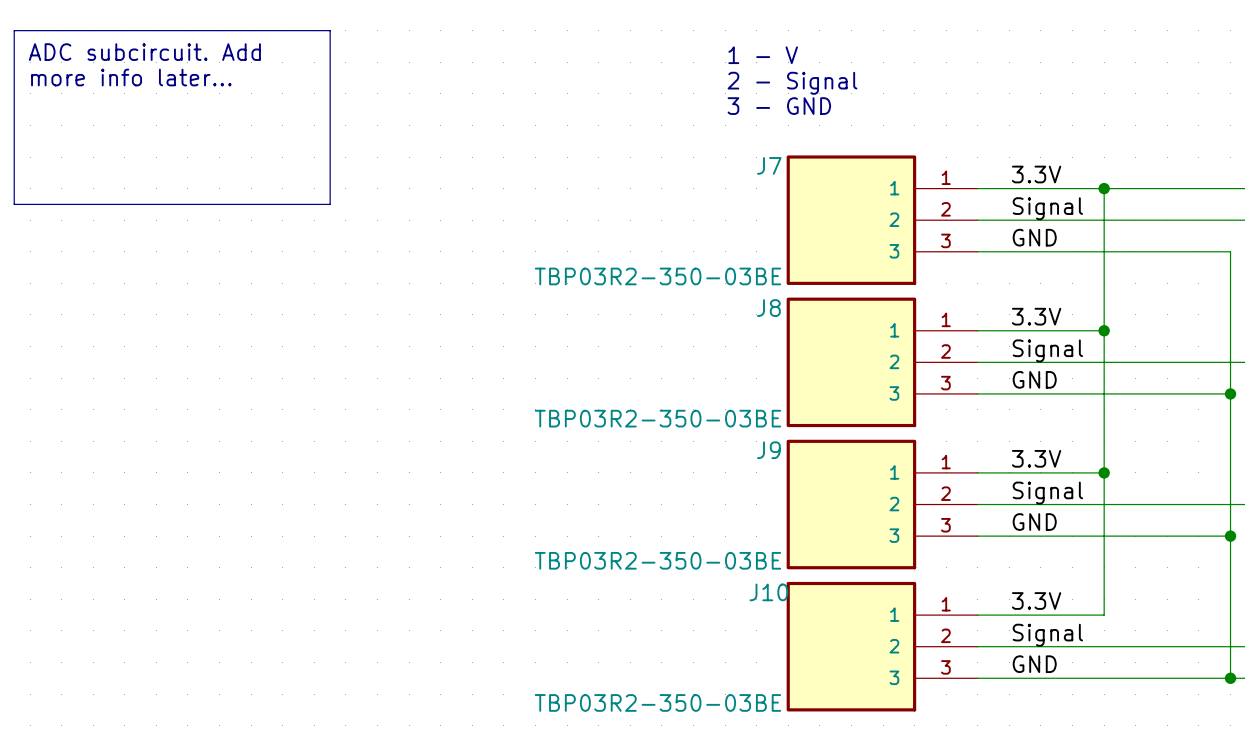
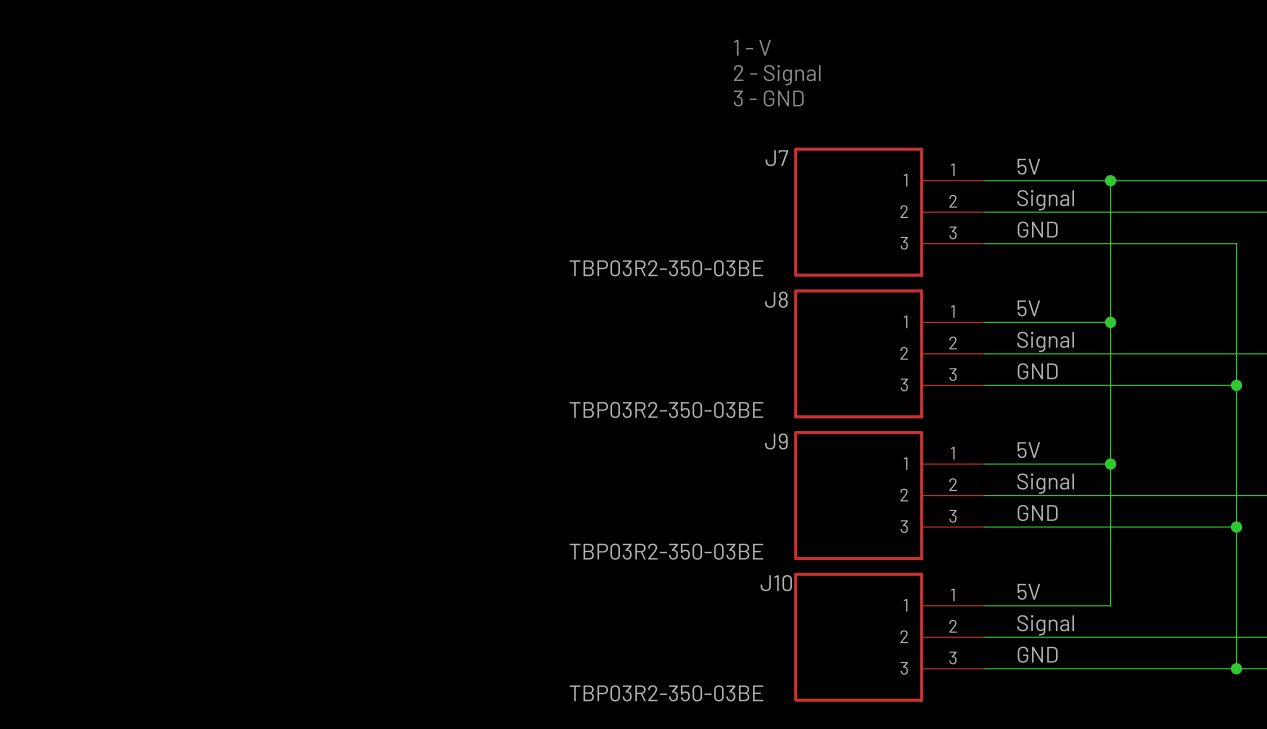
line: (14, 30) (330, 30) (330, 204) (14, 204) (14, 30) -> none
text: ADC subcircuit. Add (144, 52) -> none
text: more info later... (131, 77) -> none
label: 3.3V (1036, 174) -> 5V (1028, 166)
label: 3.3V (1036, 316) -> 5V (1028, 308)
label: 3.3V (1036, 458) -> 5V (1028, 450)
label: 3.3V (1036, 601) -> 5V (1028, 591)

